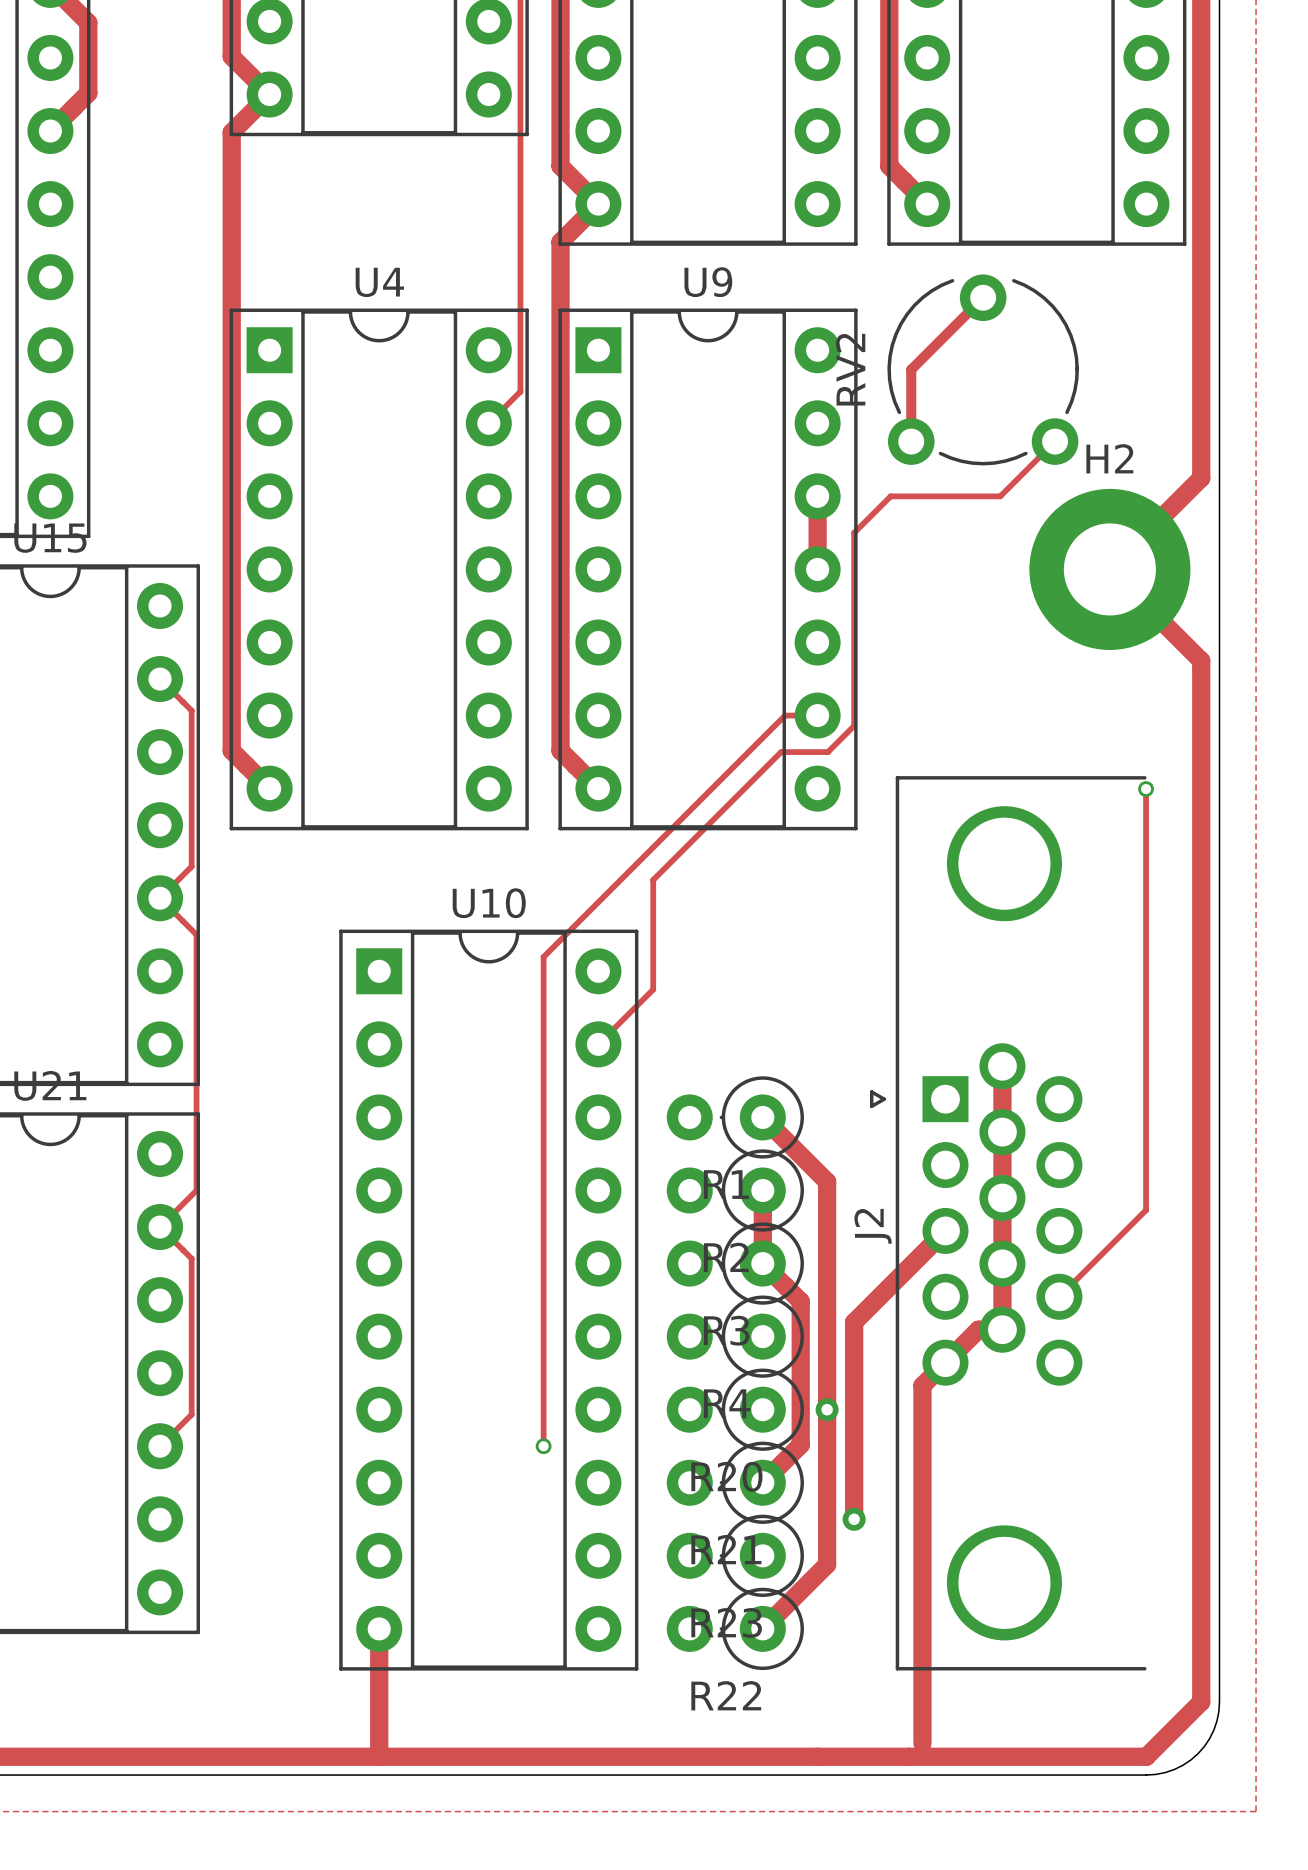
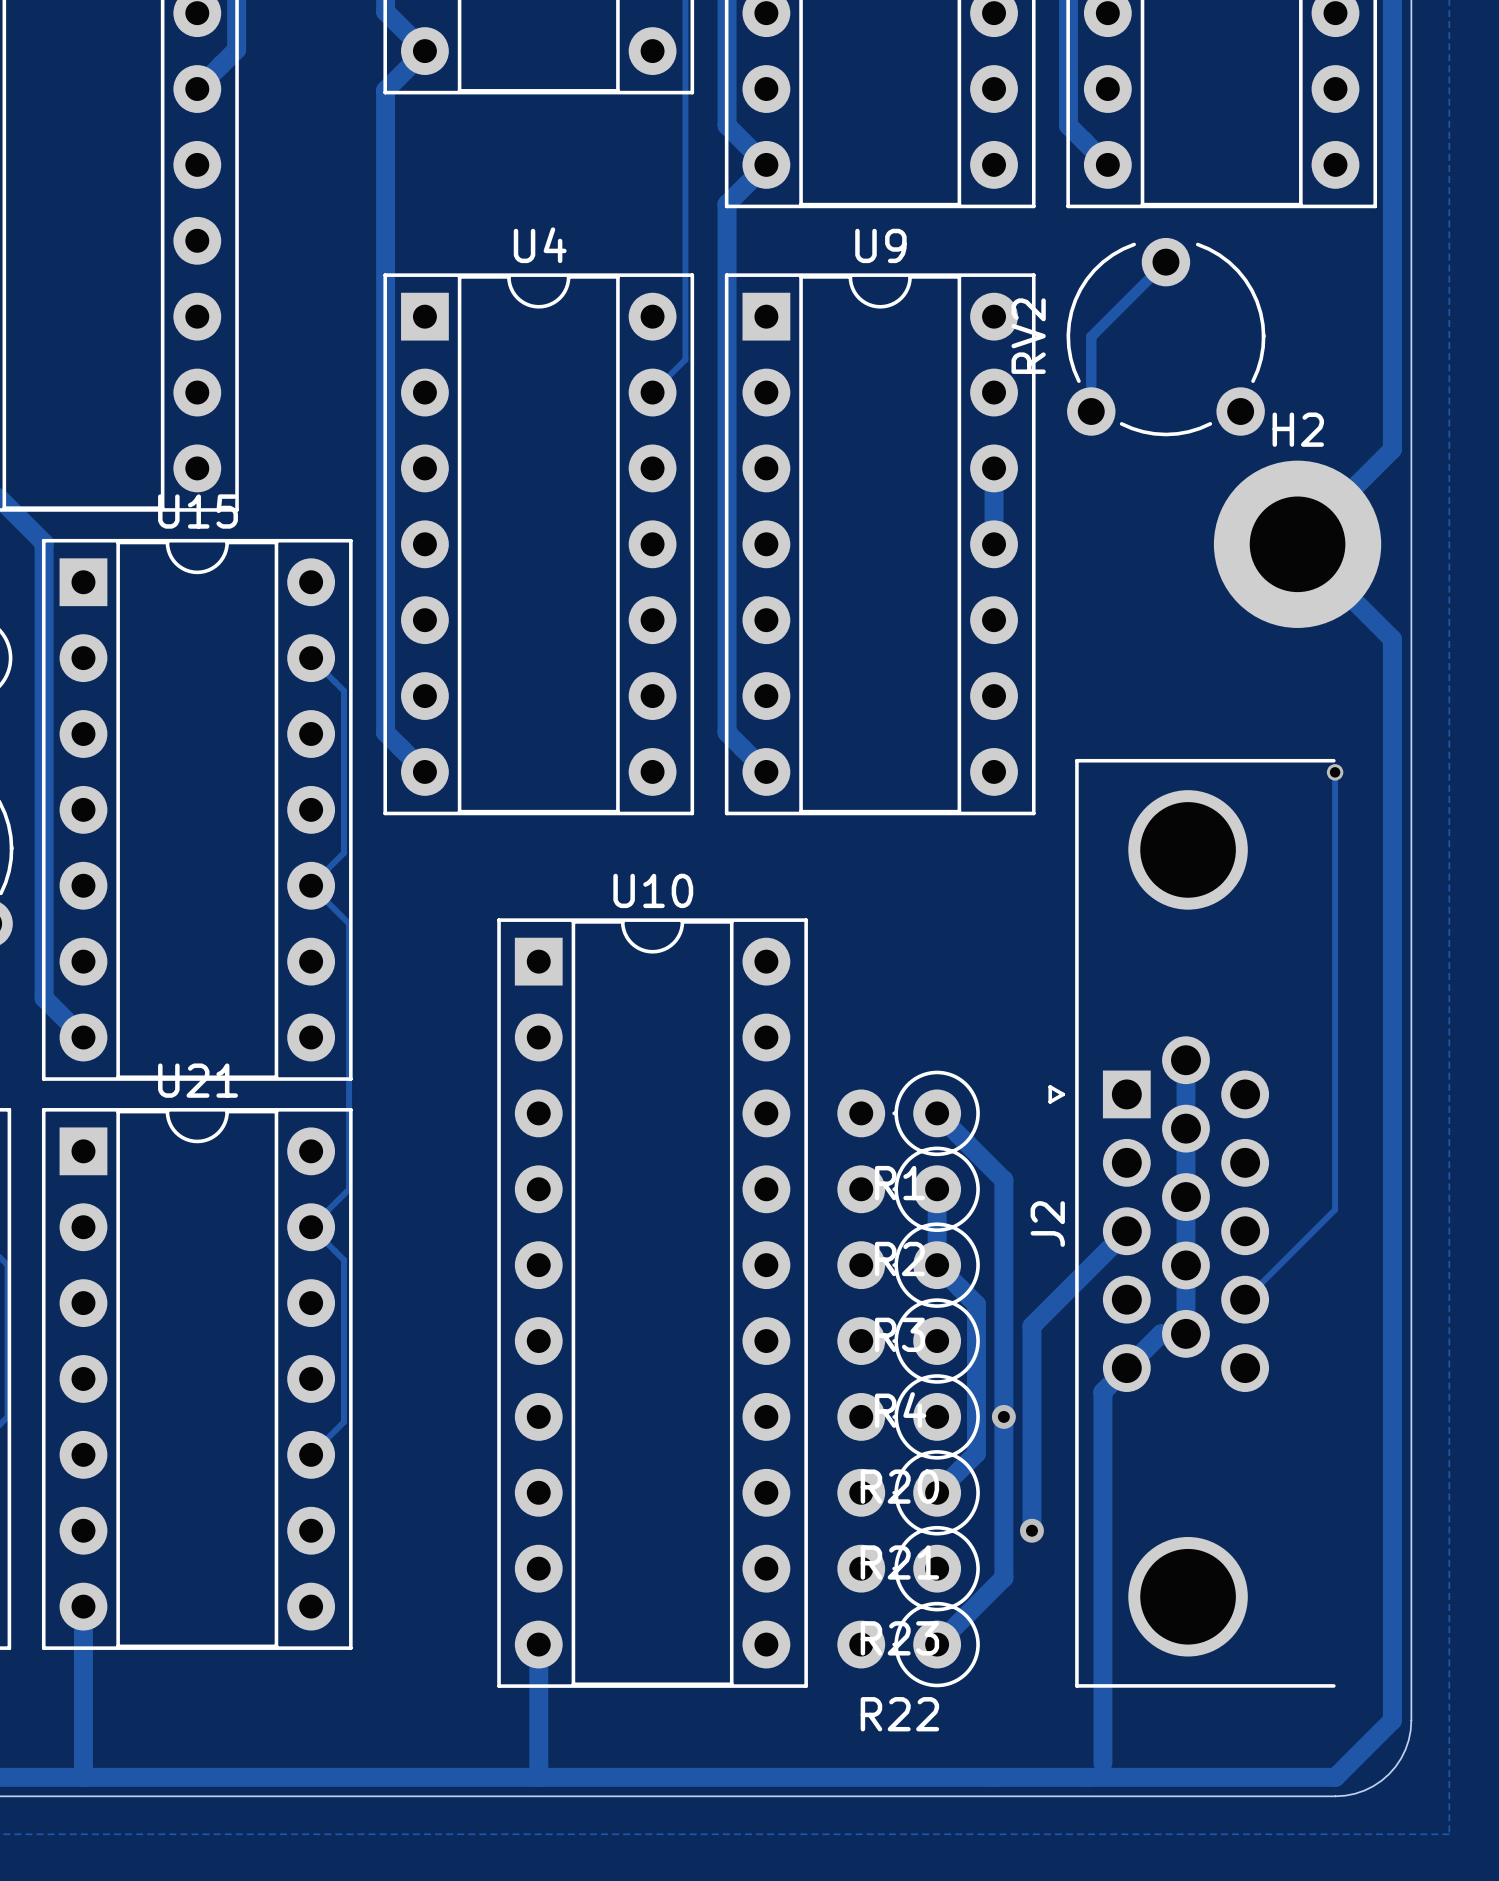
track: (1055, 441) (1000, 496) (890, 496) (854, 532) (854, 725) (827, 752) (781, 752) (653, 879) (653, 989) (598, 1044) -> none
track: (817, 715) (785, 715) (543, 957) (543, 1446) -> none
via: (543, 1446) -> none

